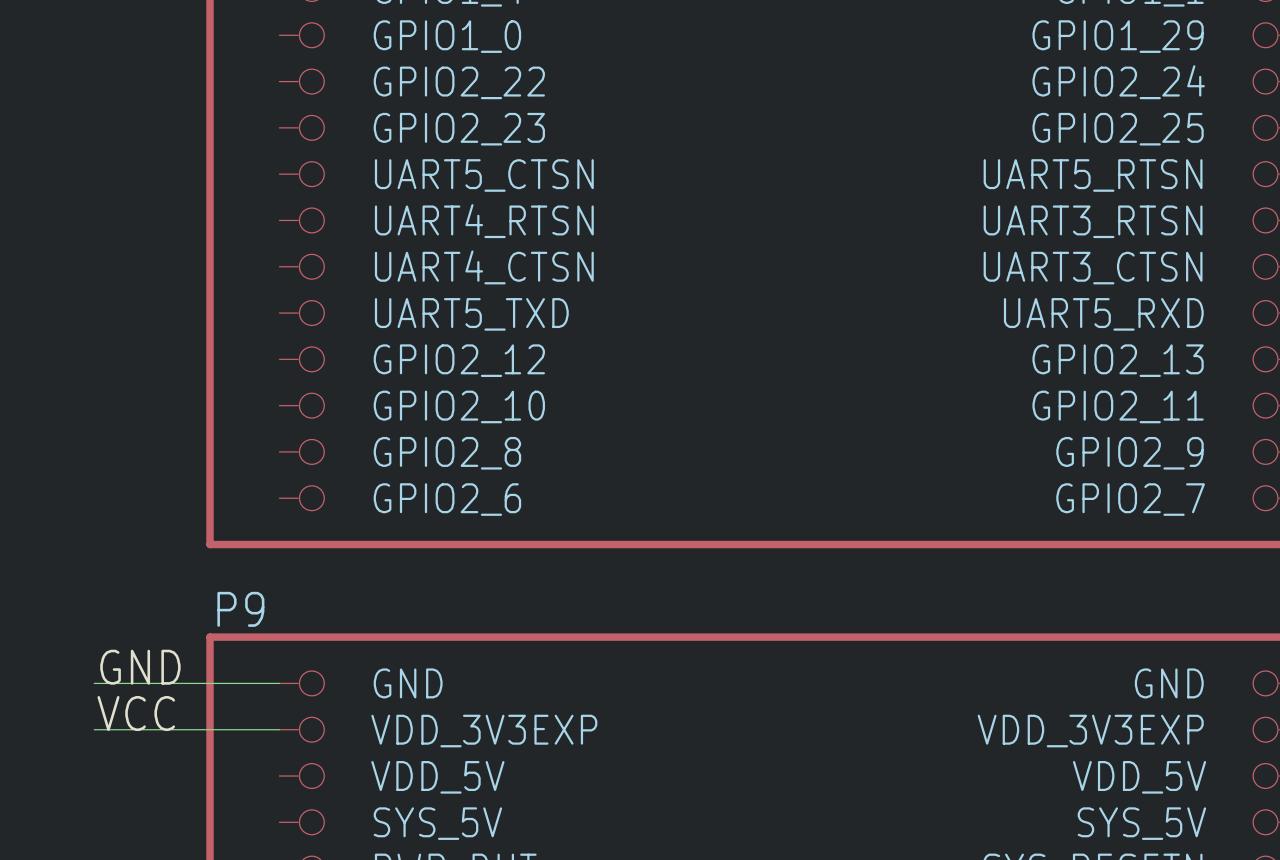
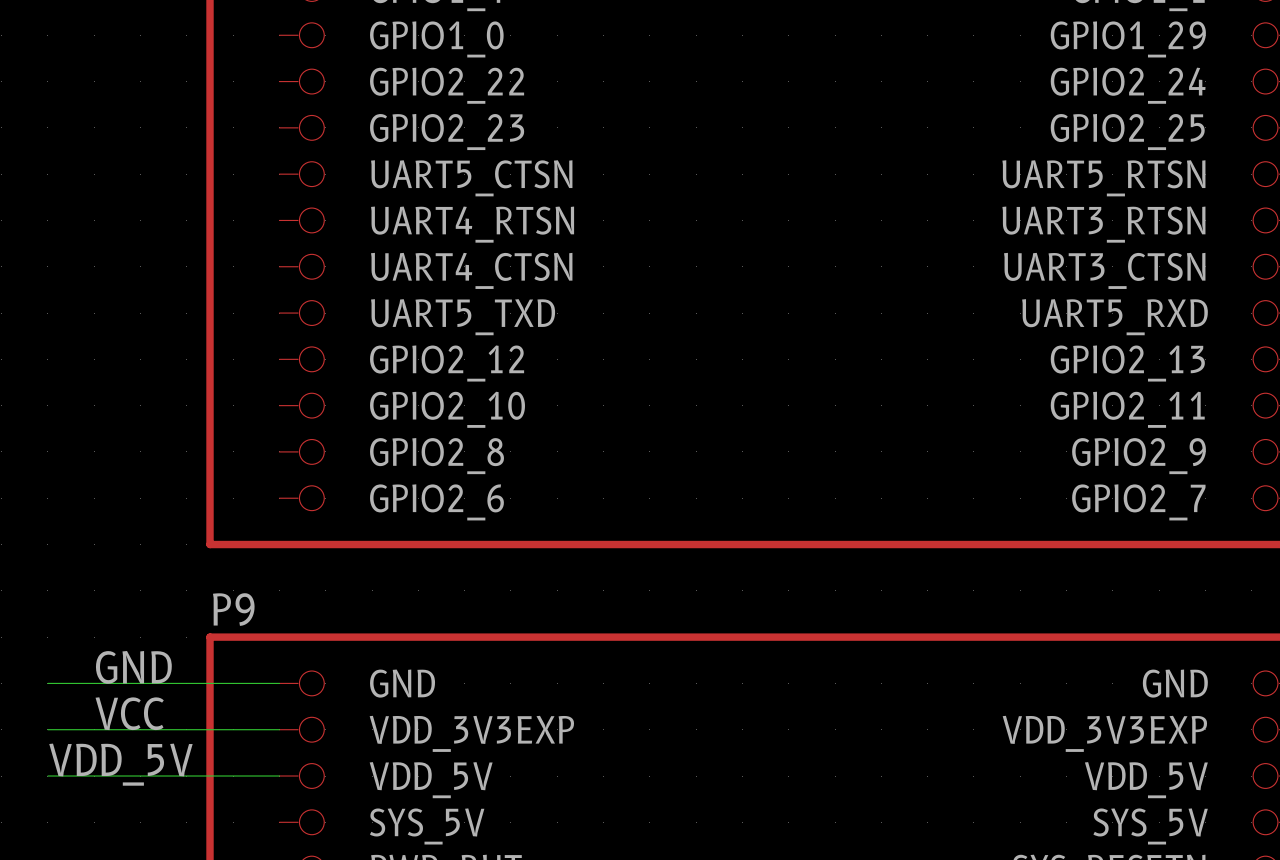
wire: none -> (47, 683) (94, 683)
wire: none -> (47, 729) (94, 729)
label: none -> VDD_5V (120, 764)
wire: none -> (47, 776) (279, 776)

